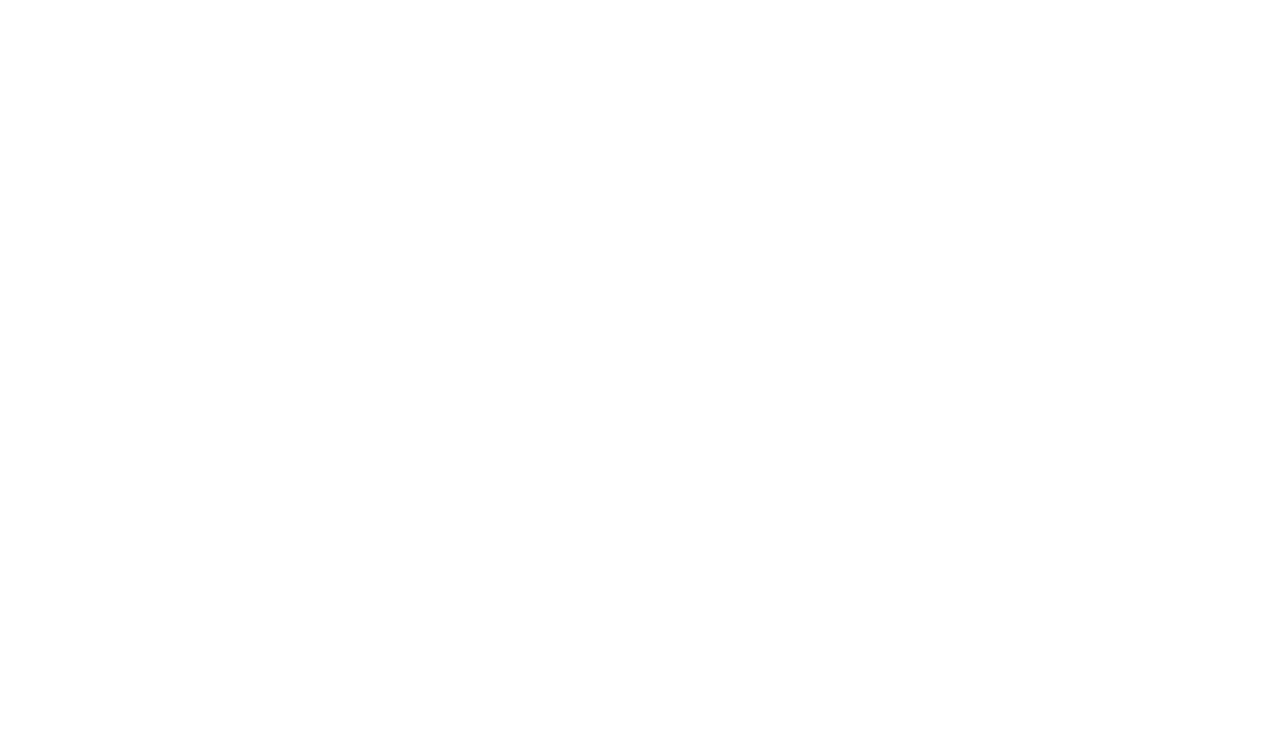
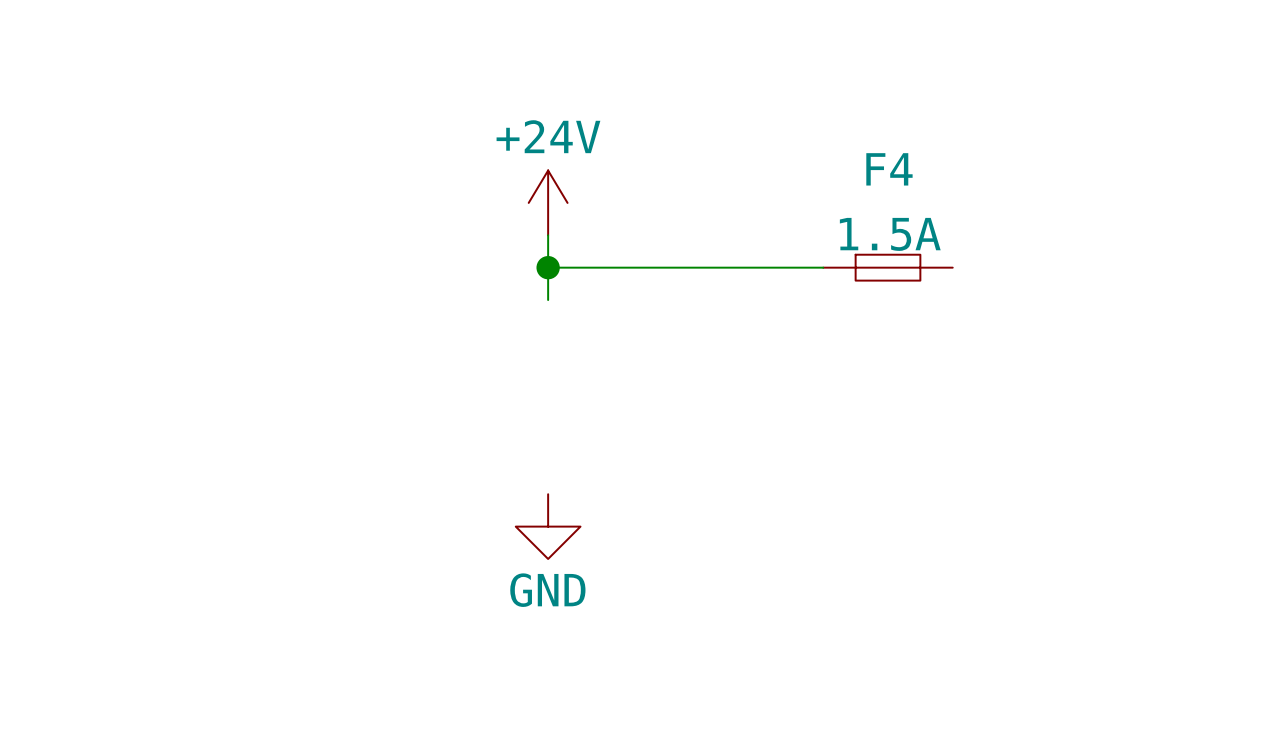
power symbol: none -> +24V (548, 202)
wire: none -> (548, 235) (548, 300)
wire: none -> (548, 267) (823, 267)
junction: none -> (548, 267)
F4: none -> 1.5A (888, 267)
power symbol: none -> GND (548, 526)

